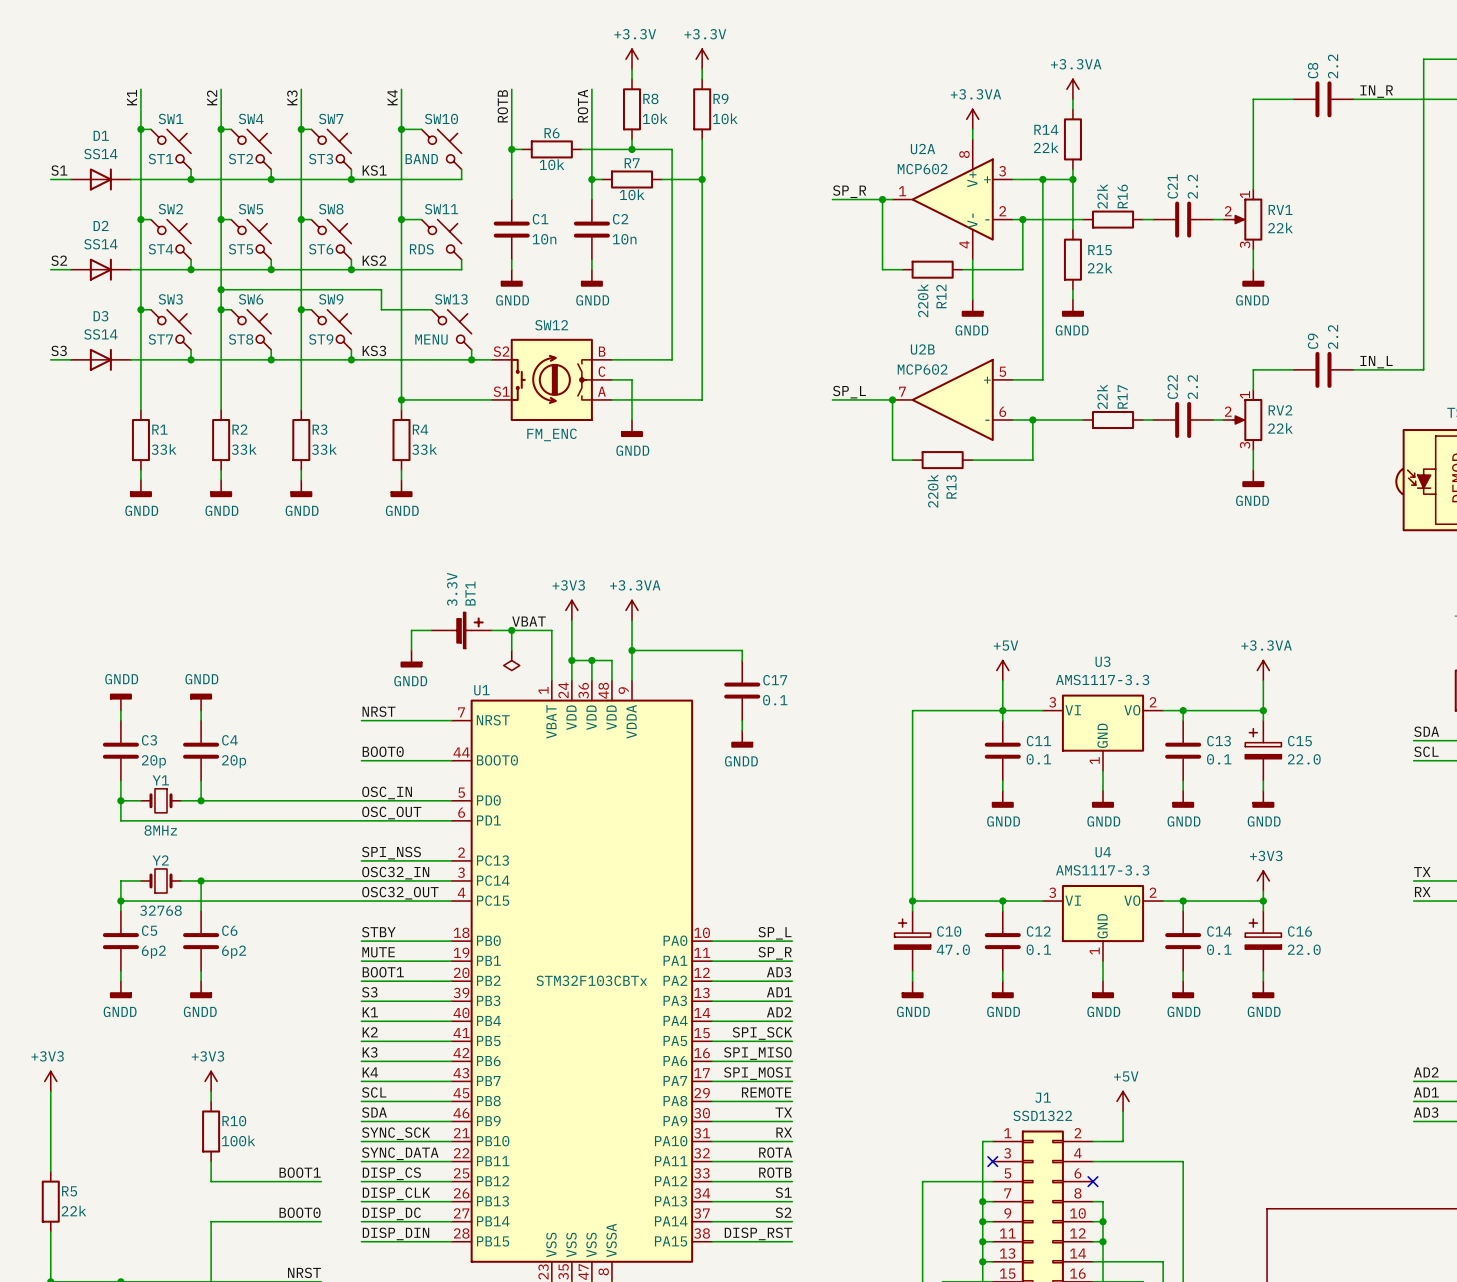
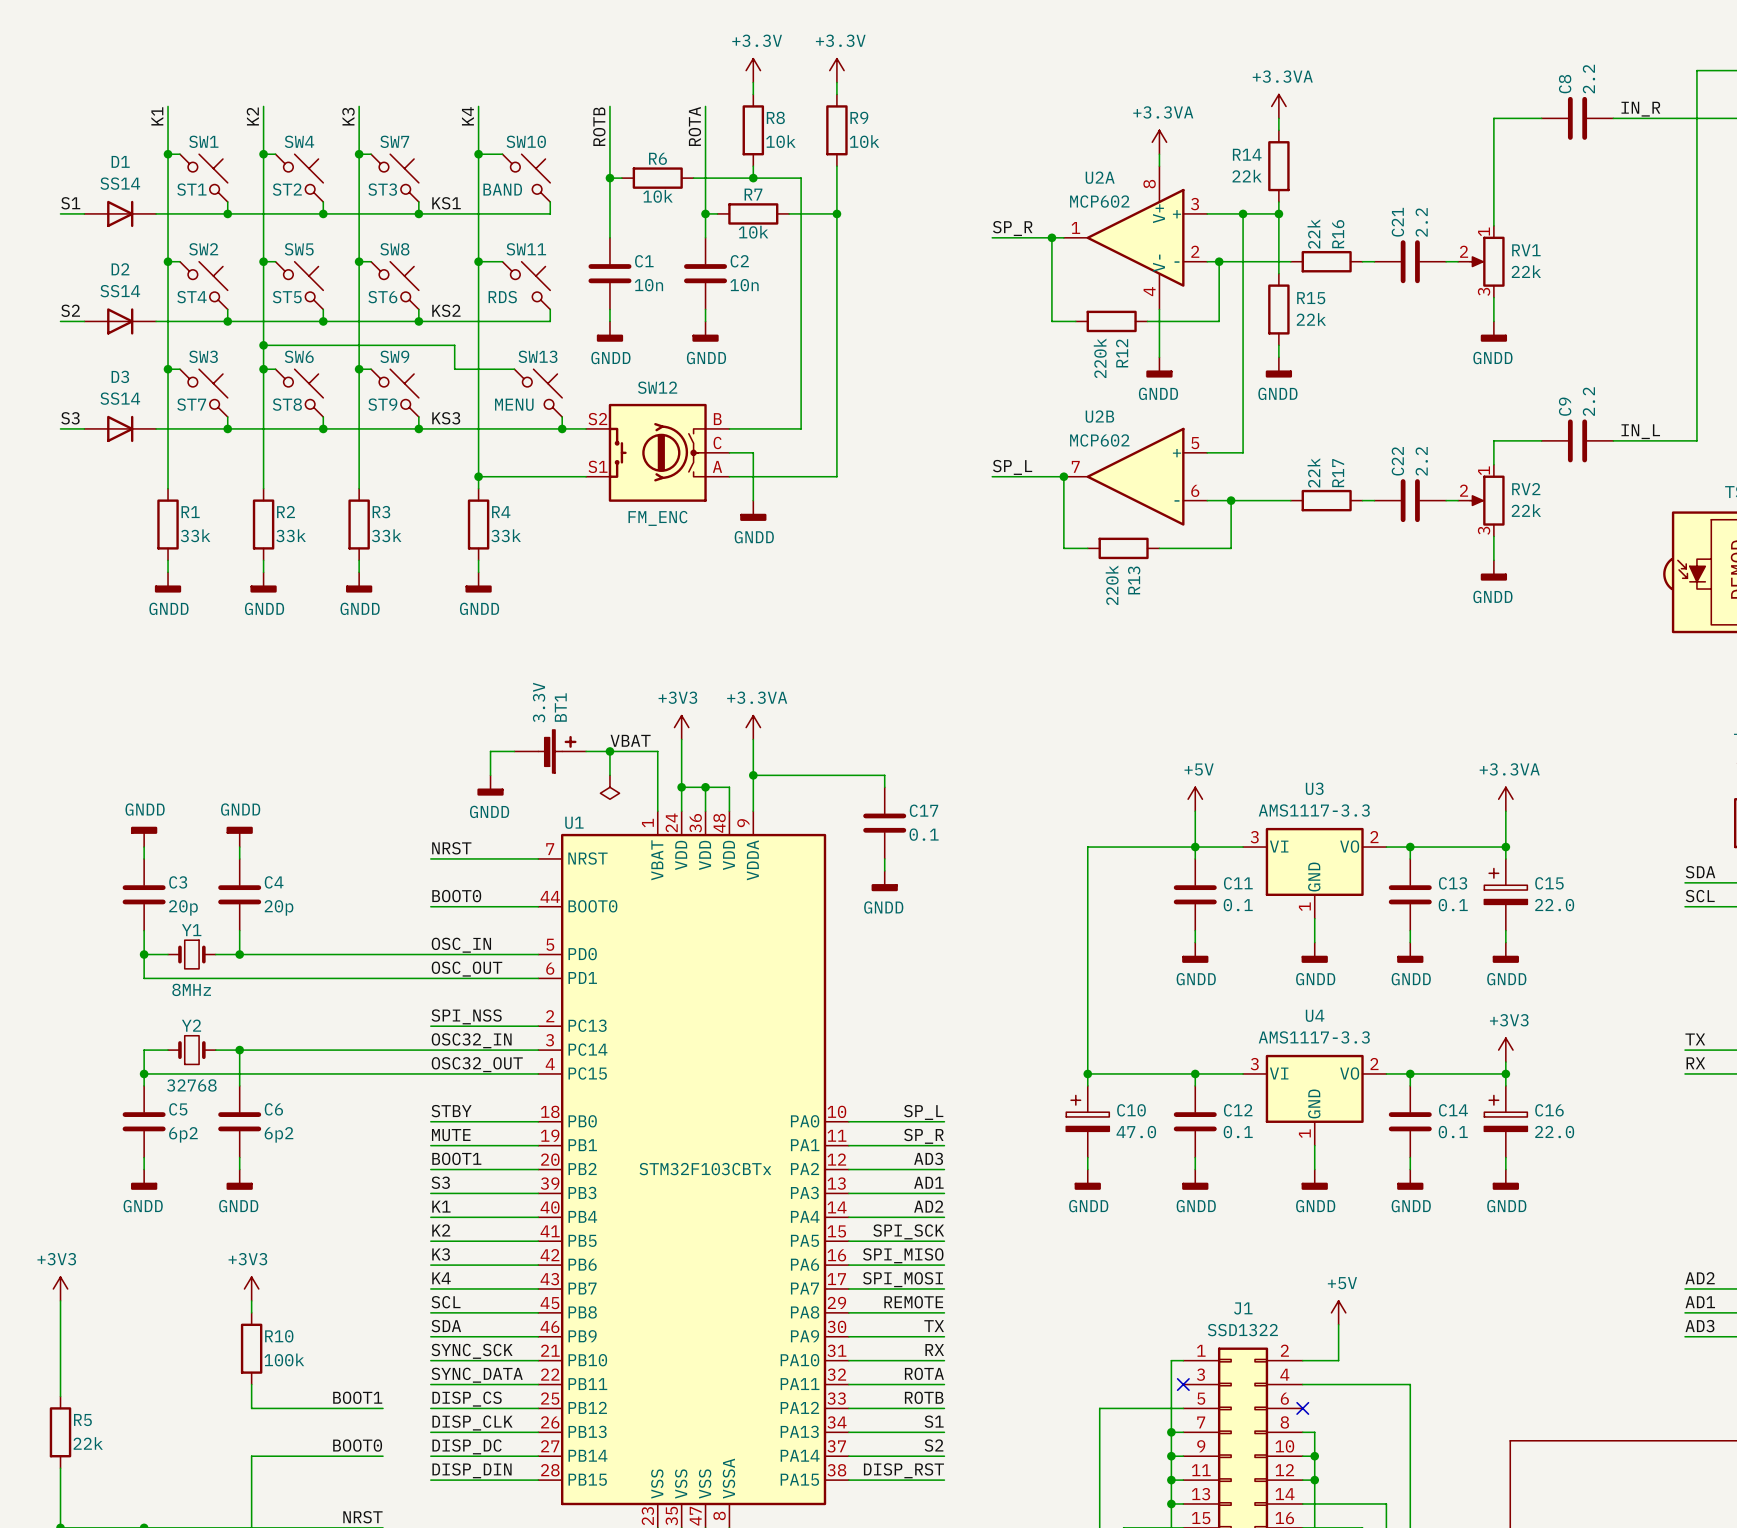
SW12 symbol: [491, 338, 612, 422] -> [586, 403, 730, 502]

